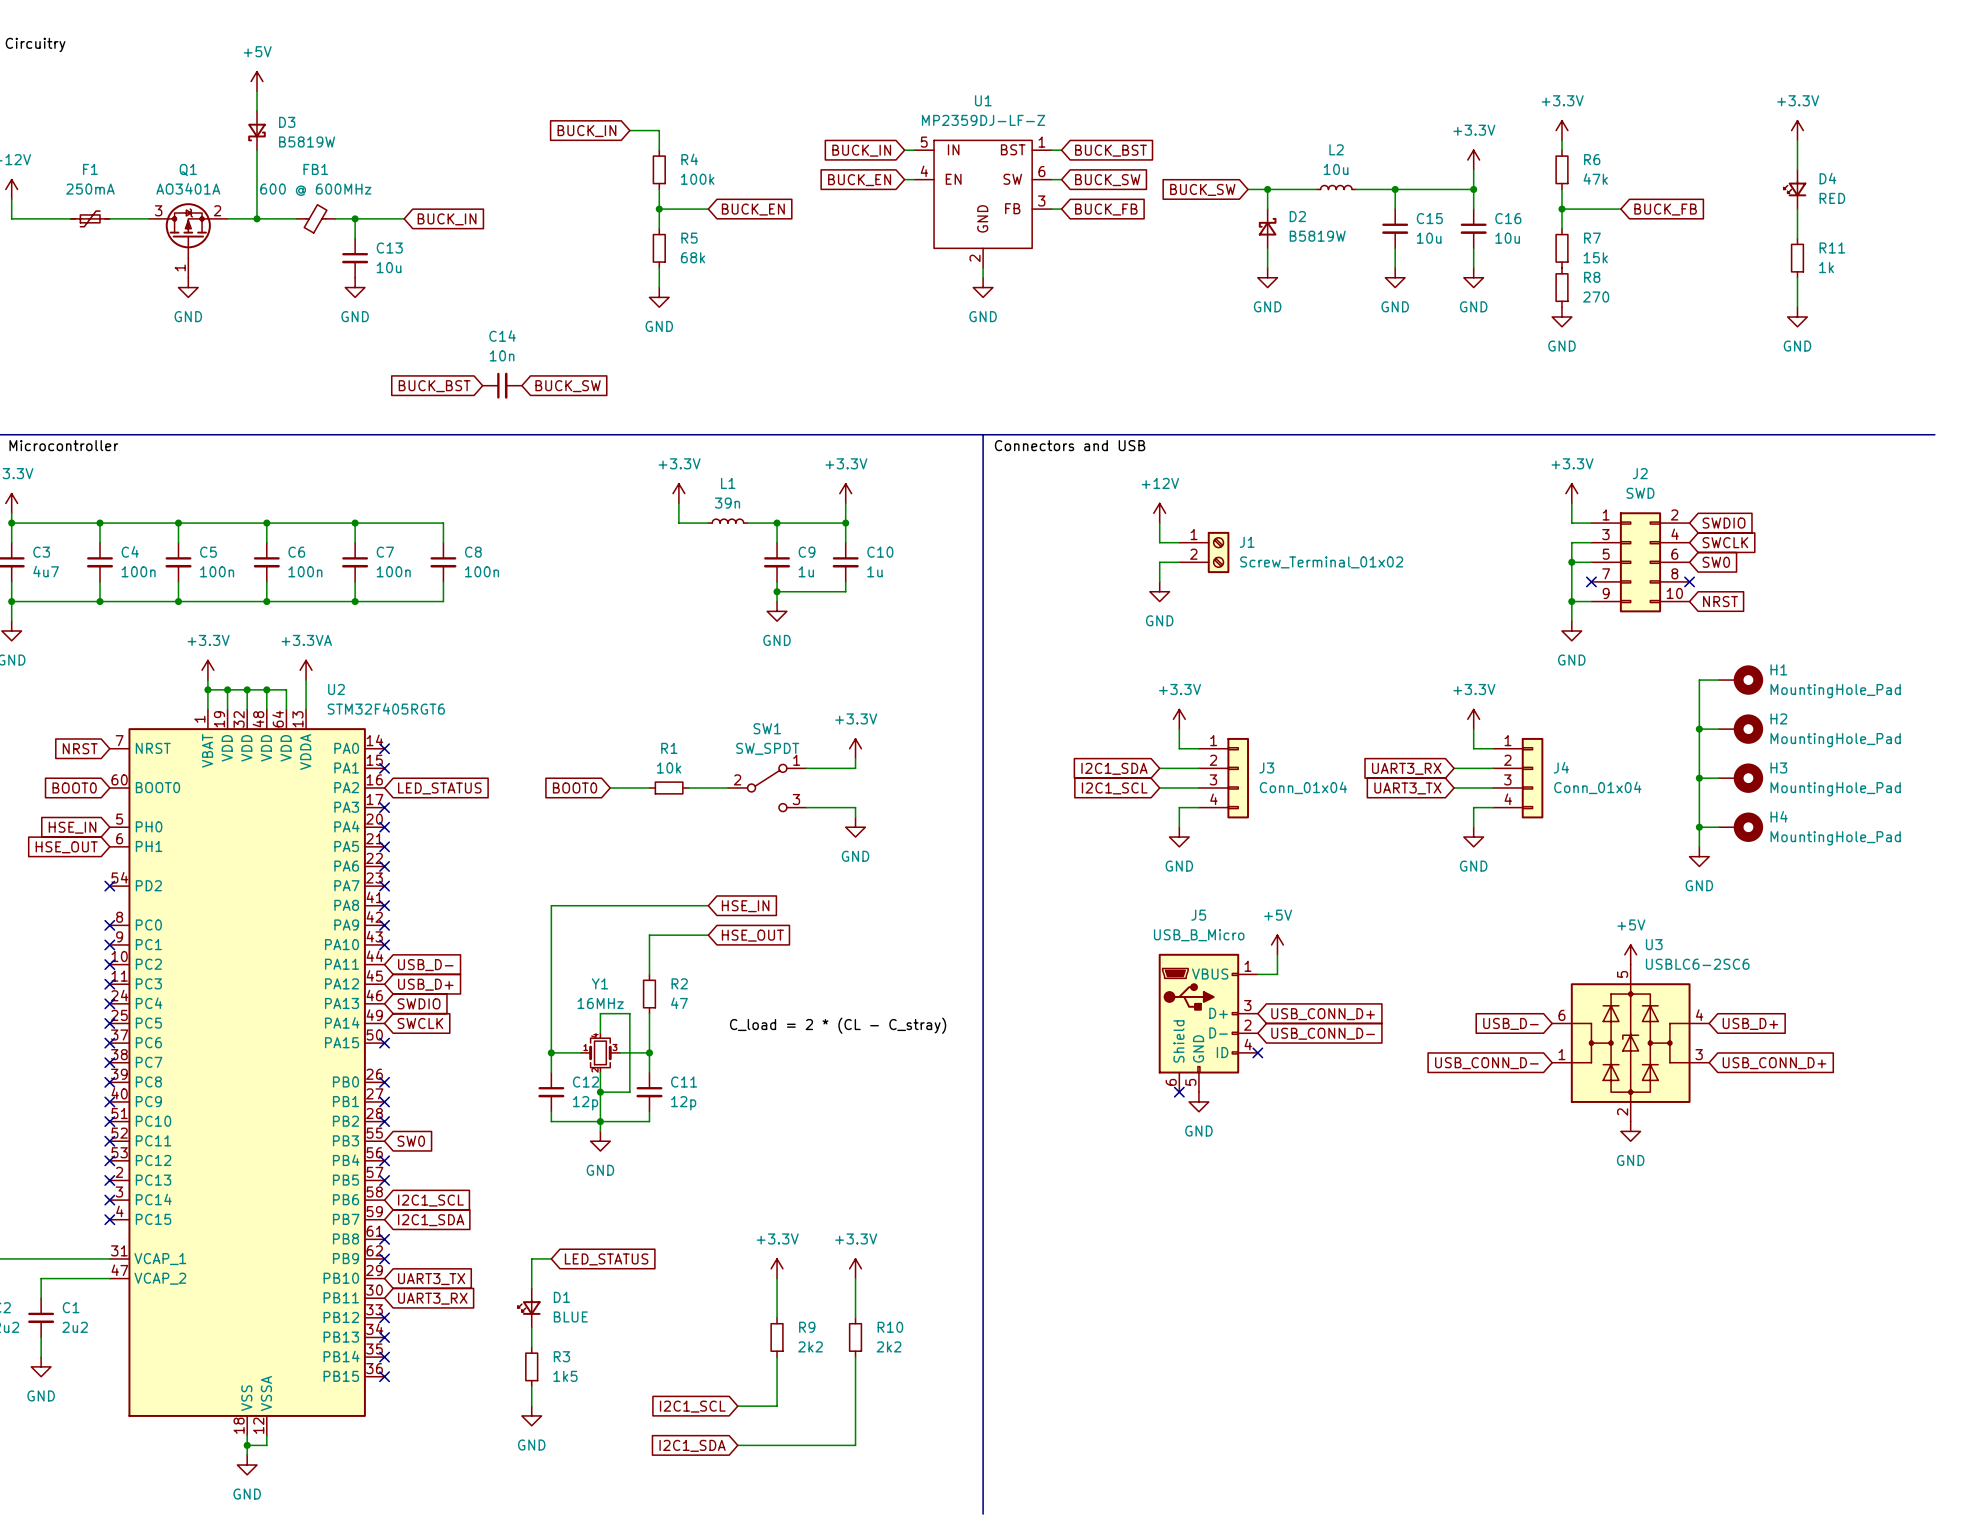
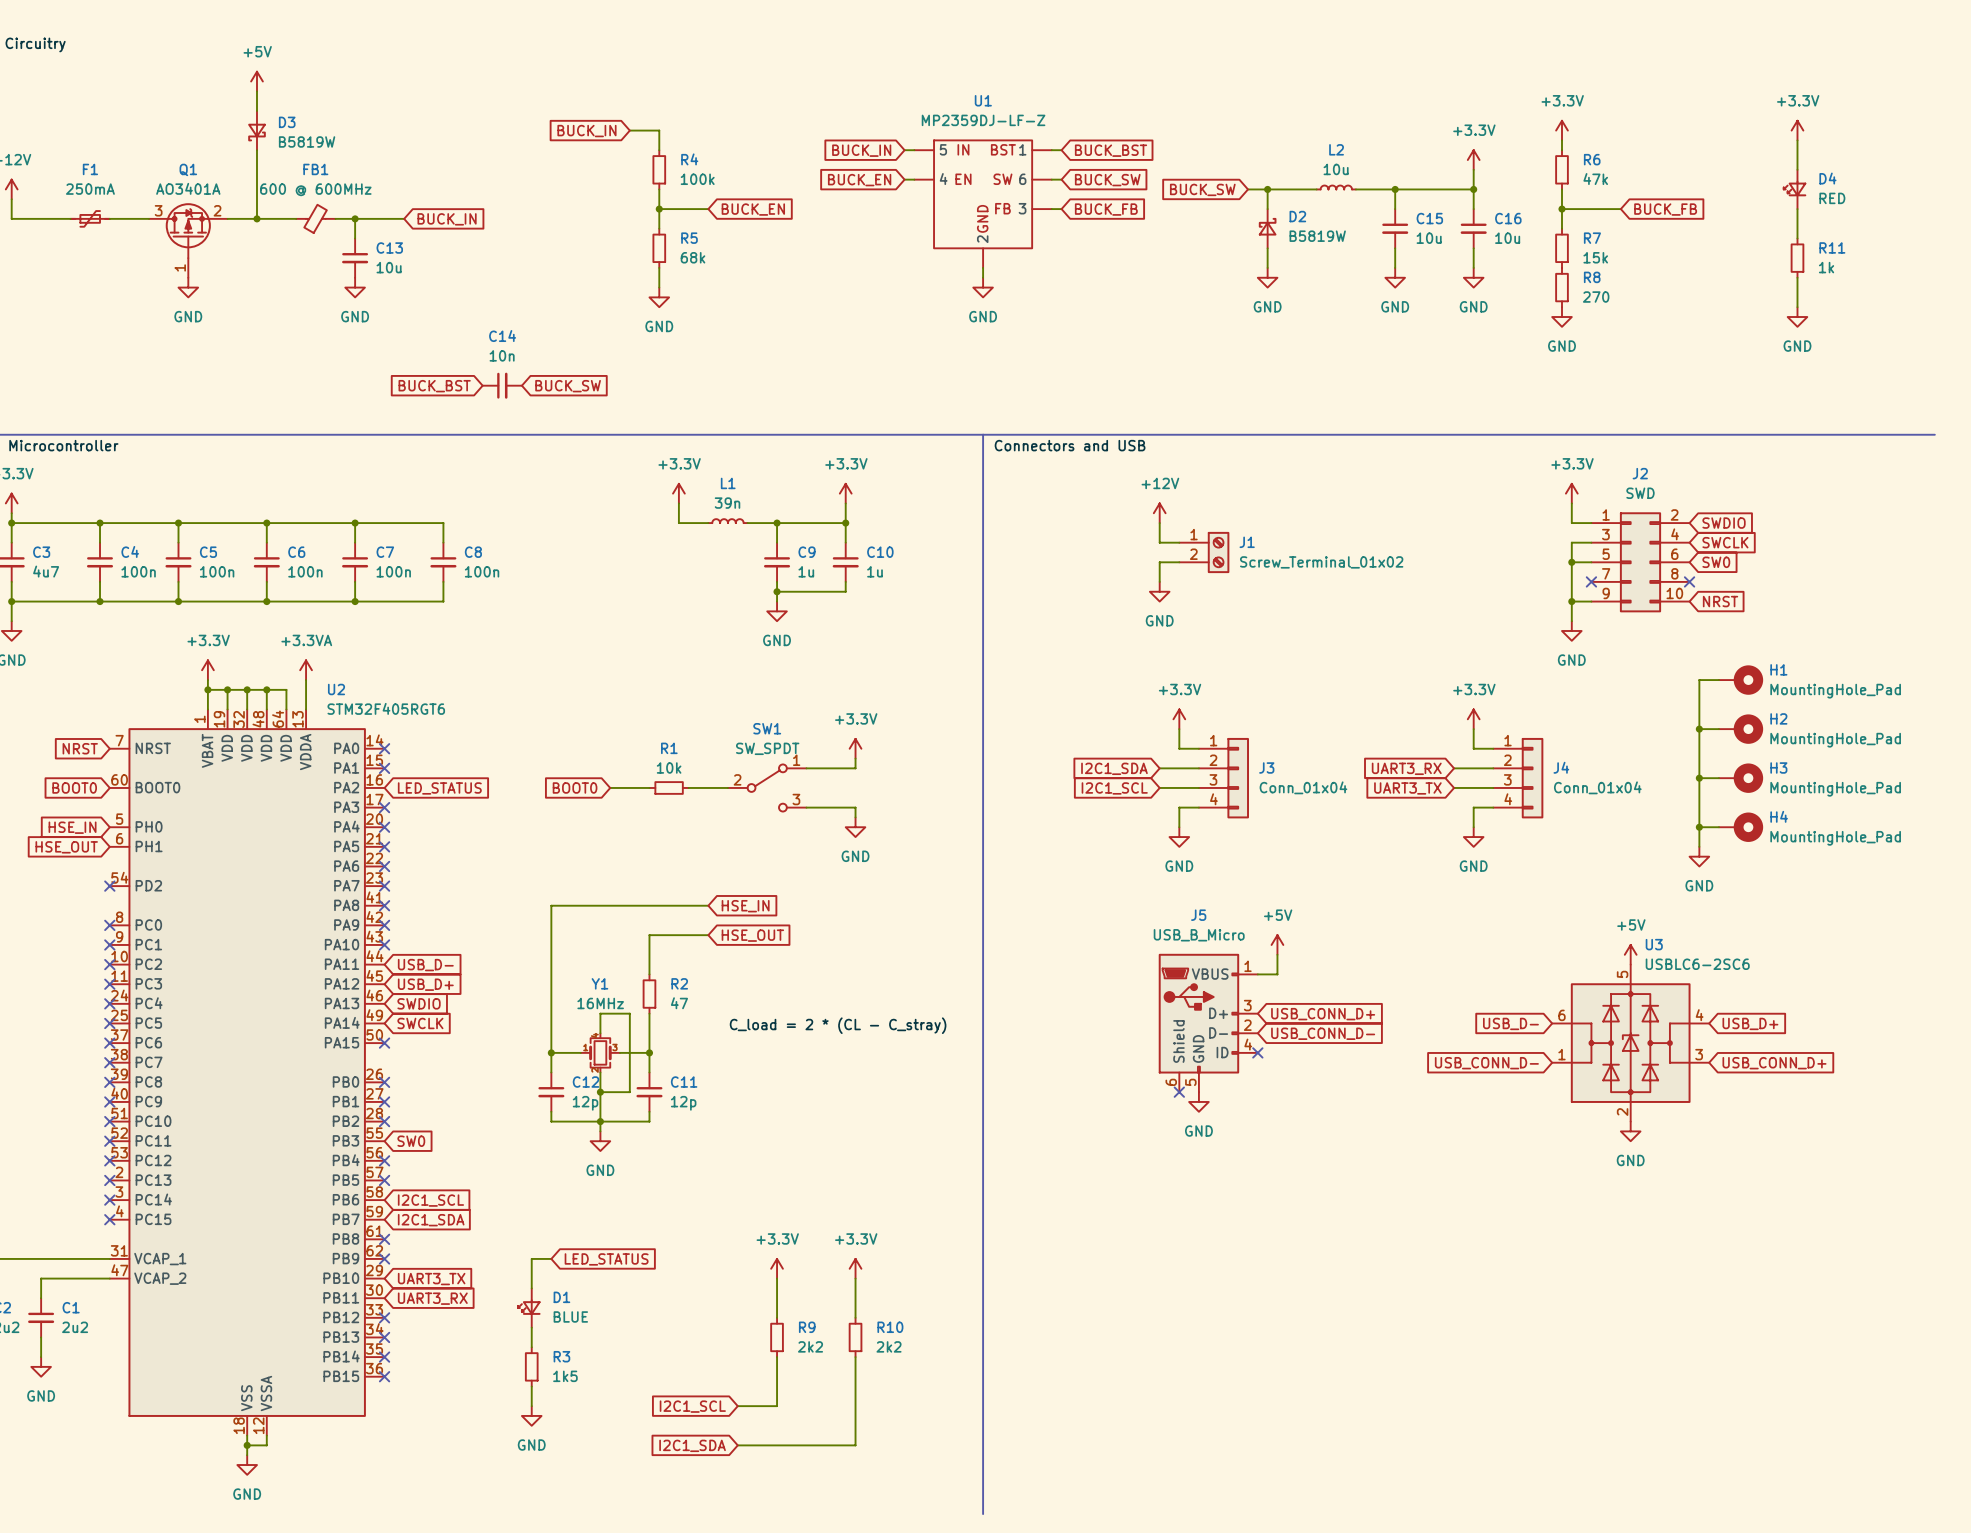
U1 symbol: [914, 140, 1052, 268] -> [914, 140, 1052, 268]

